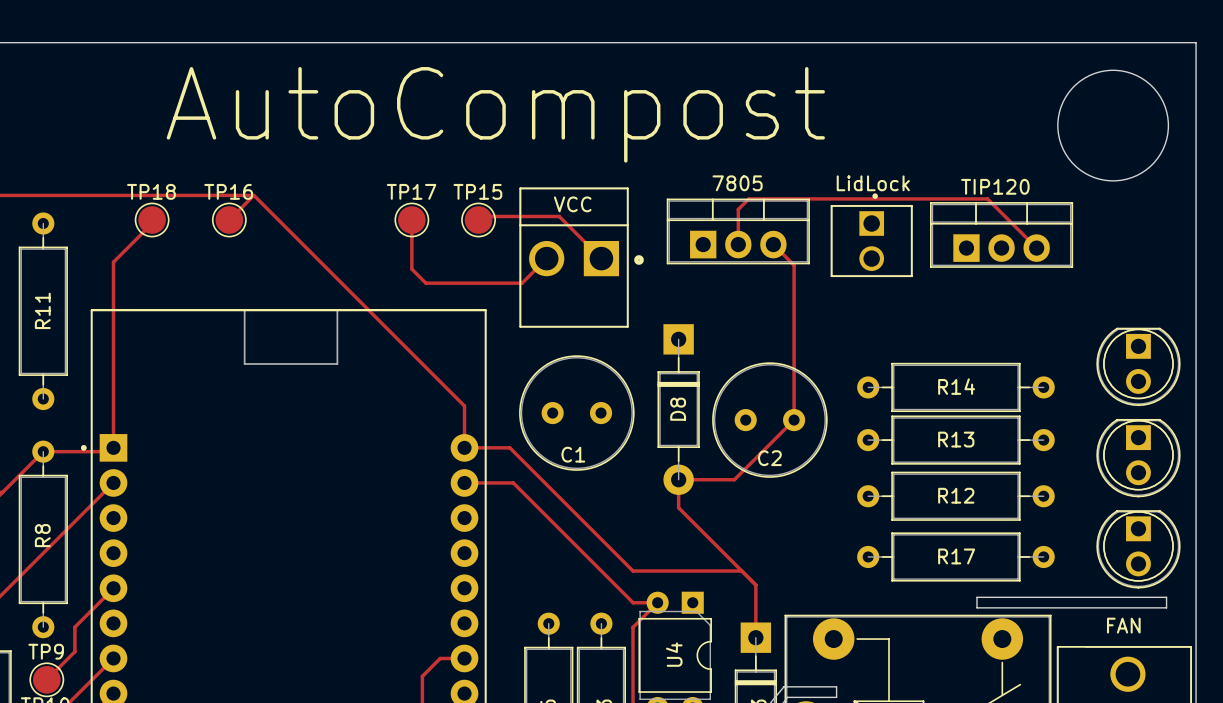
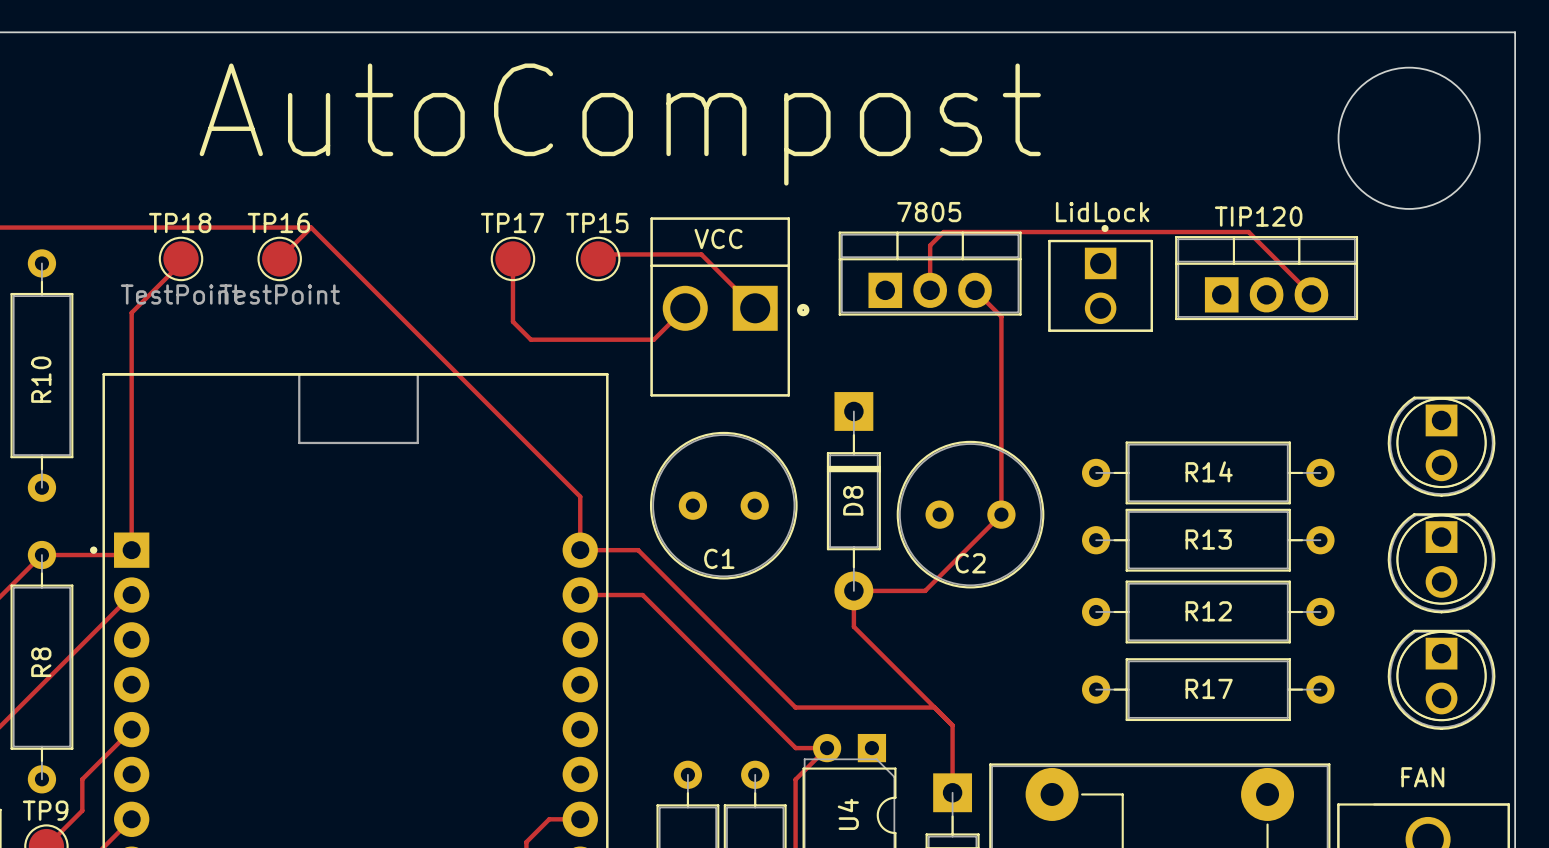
TP18 value: none -> TestPoint (181, 294)
TP16 value: none -> TestPoint (279, 294)
R11 name: R11 (42, 310) -> R10 (41, 379)
board edge: (977, 597) (1166, 597) (1166, 607) (977, 607) (977, 597) -> none

